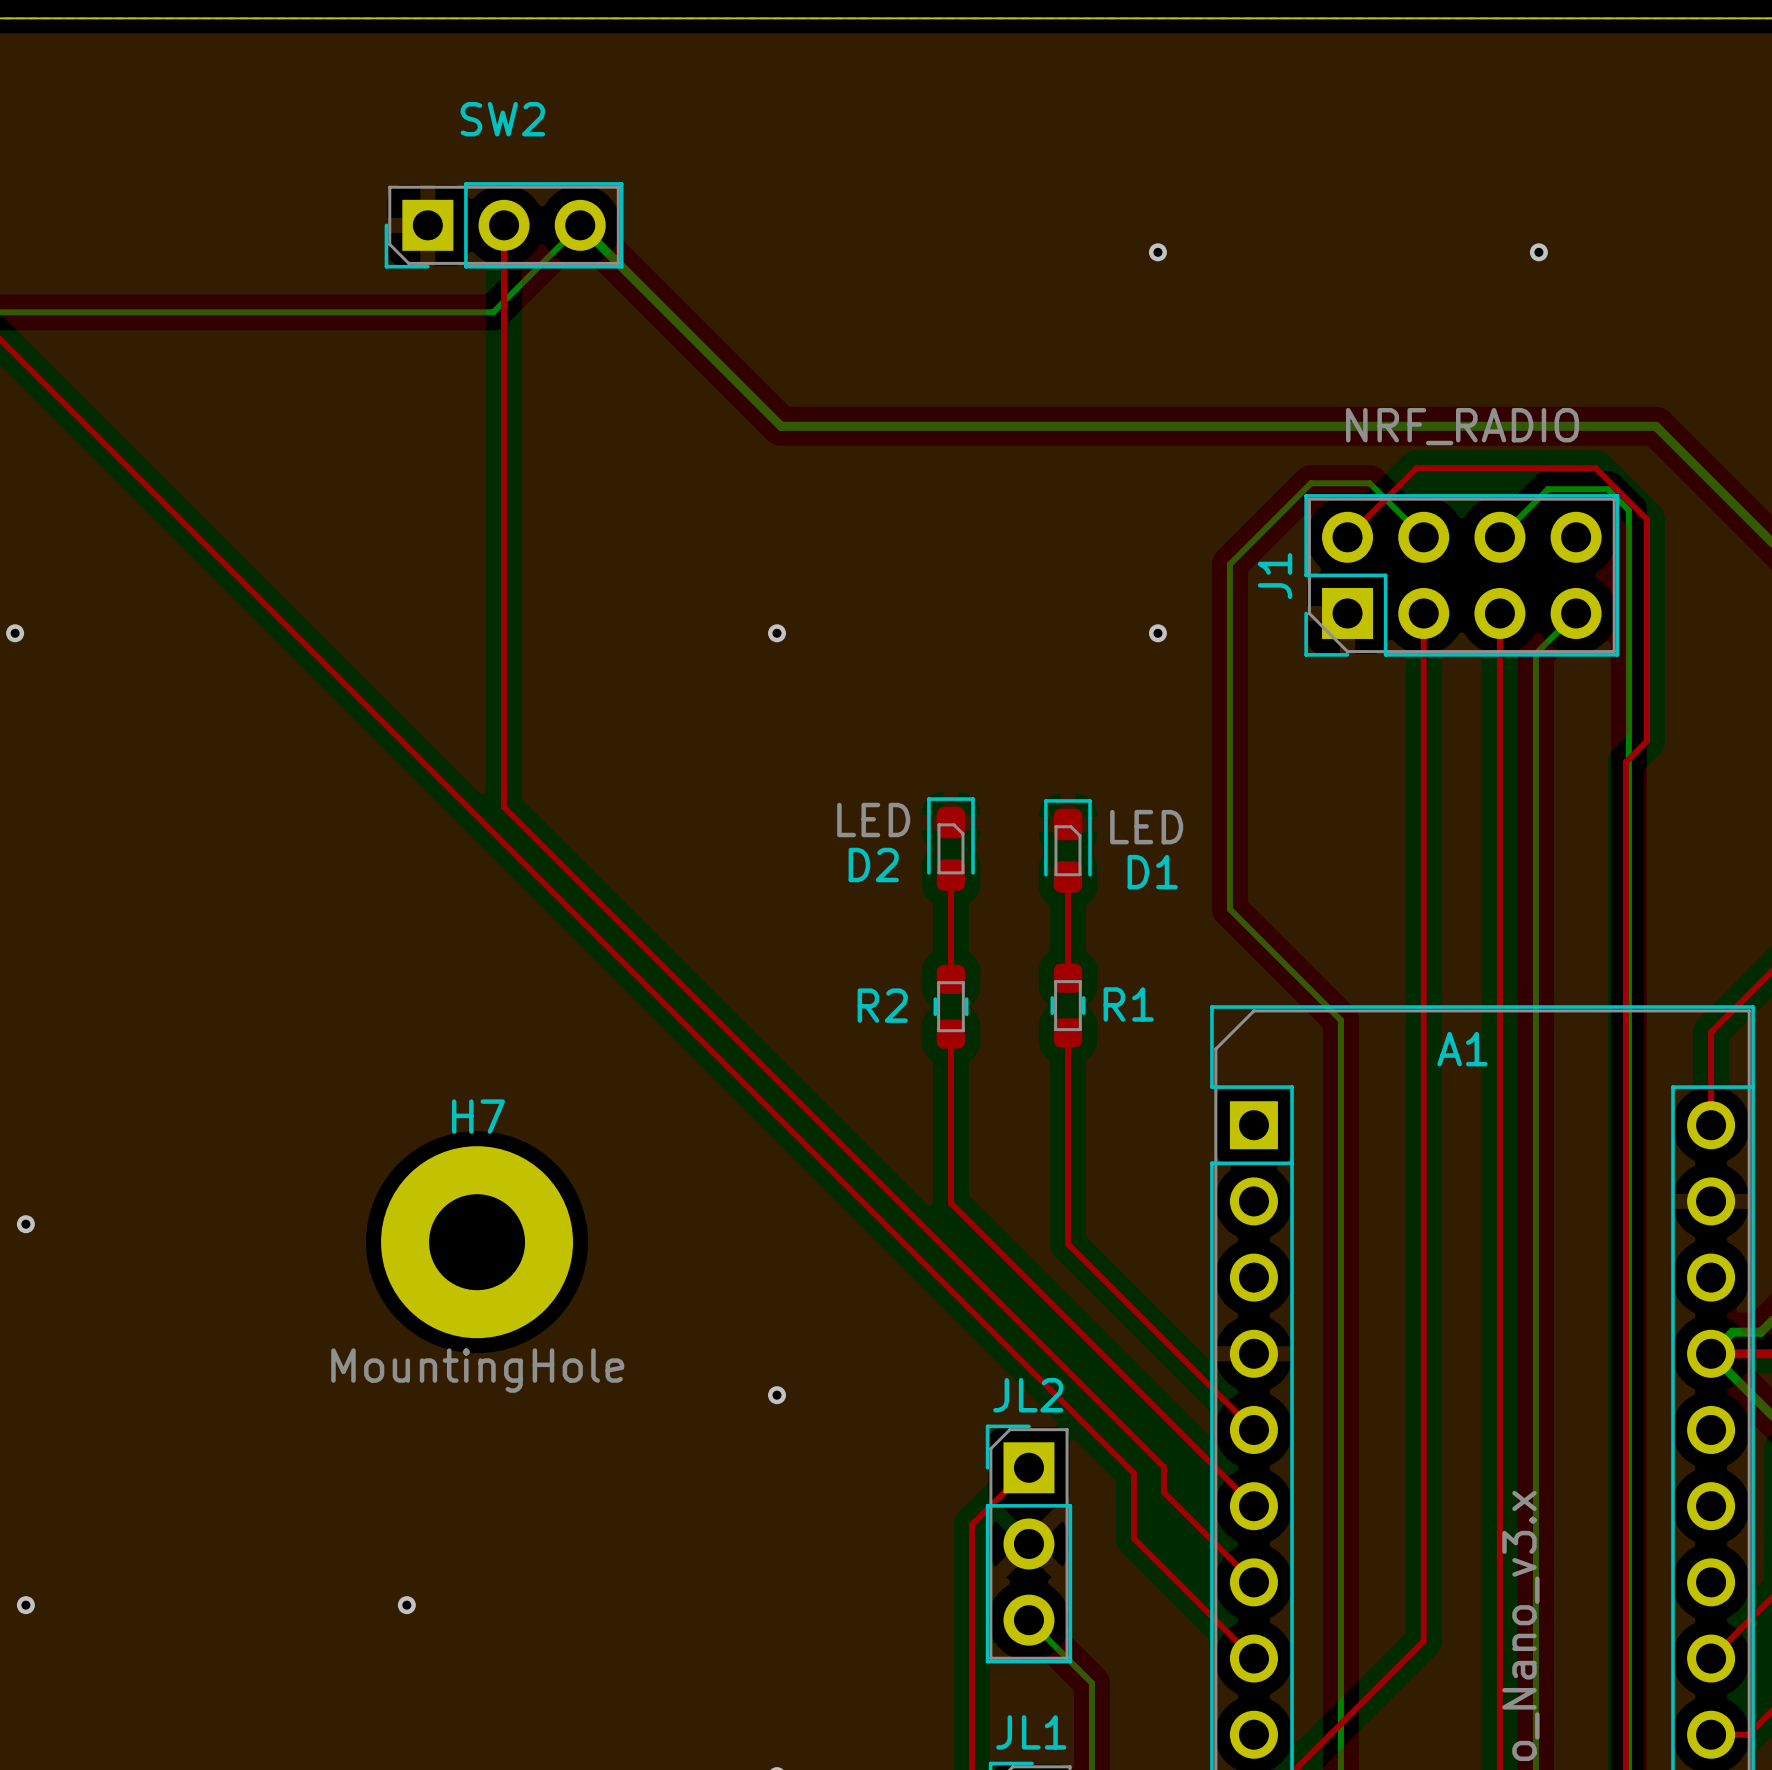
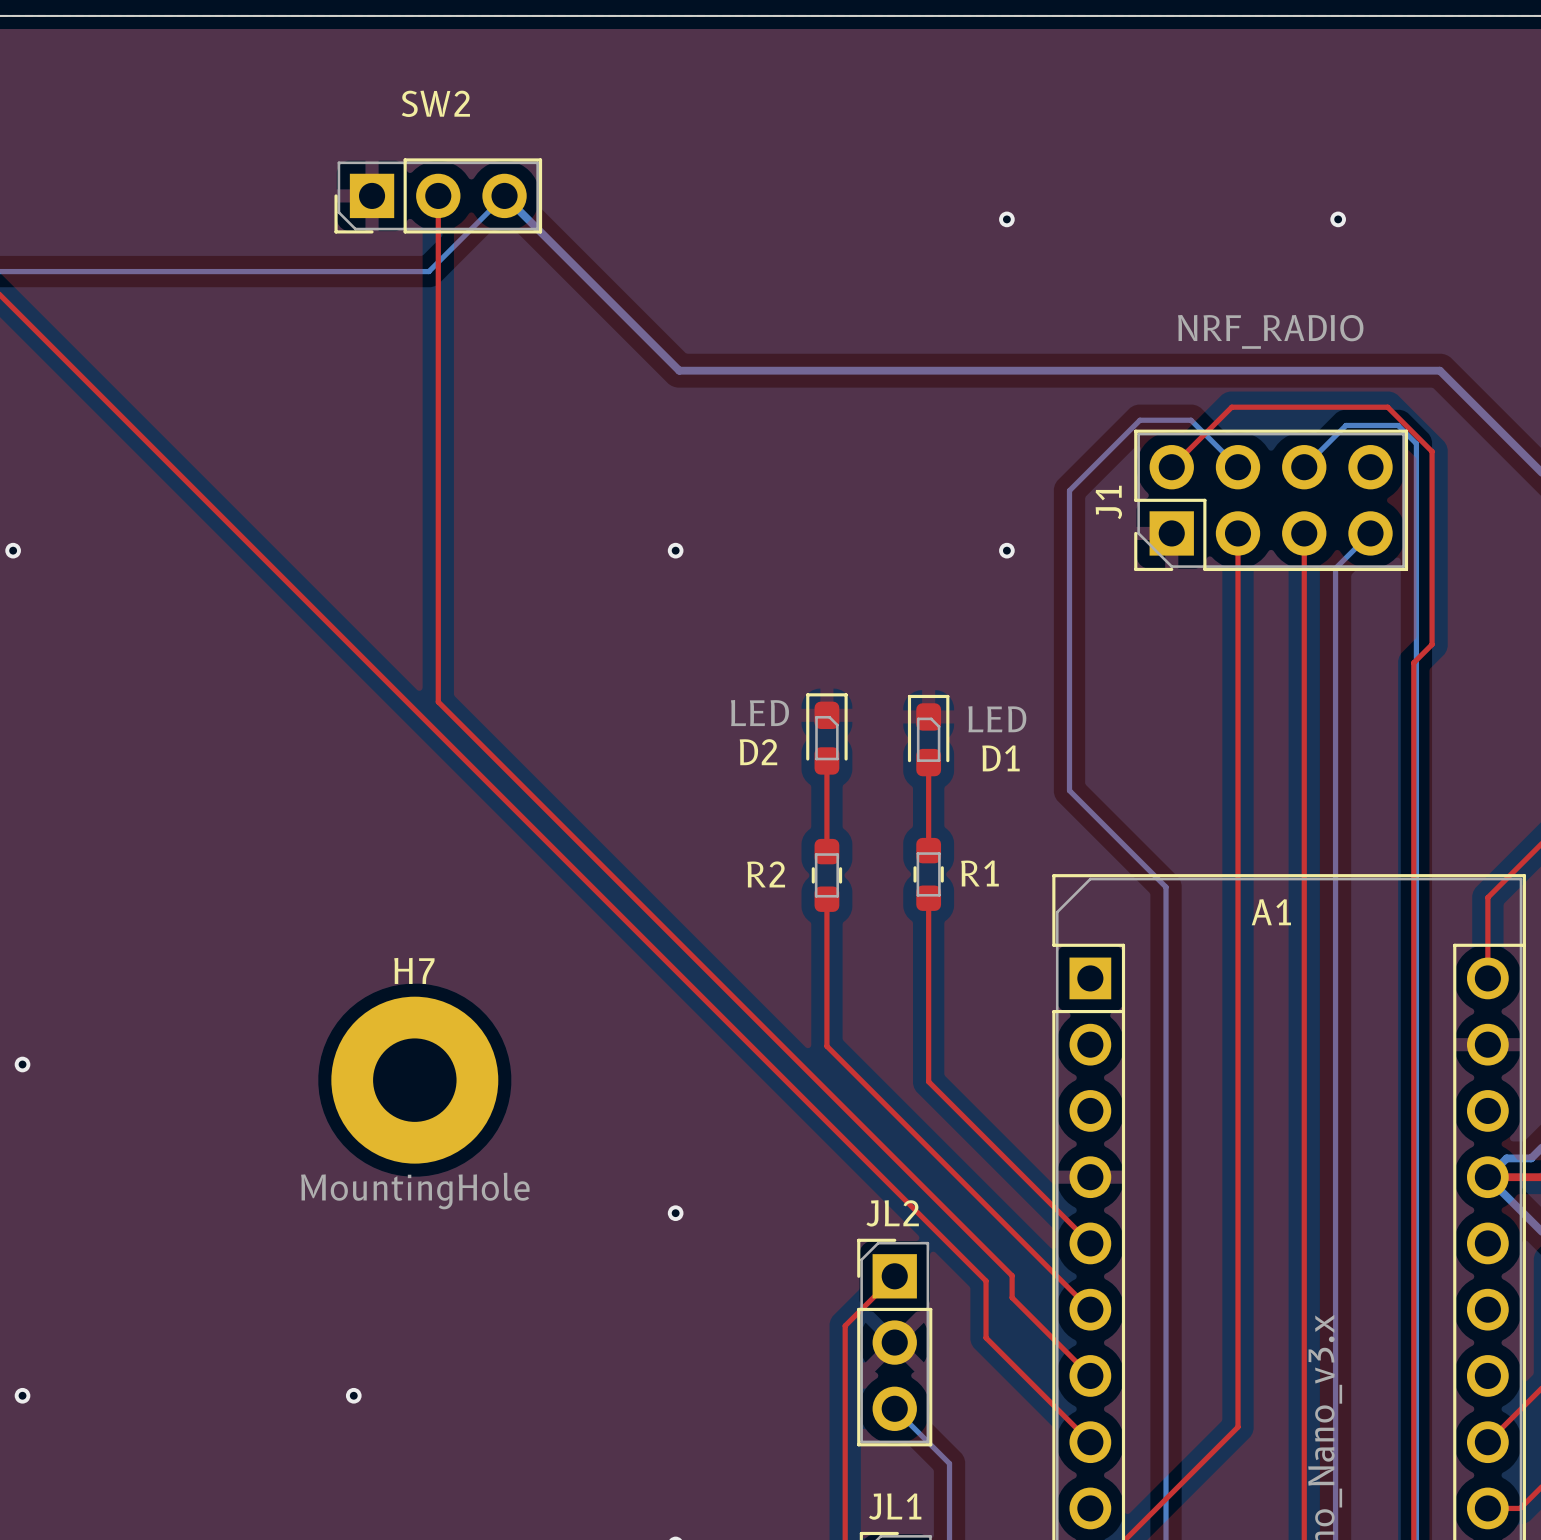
J1 value position: NRF_RADIO (1462, 426) -> NRF_RADIO (1270, 331)

